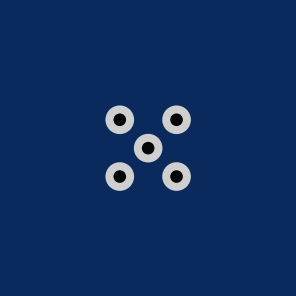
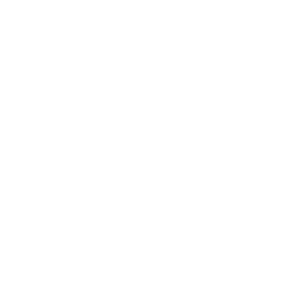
part: (148, 148) -> none

